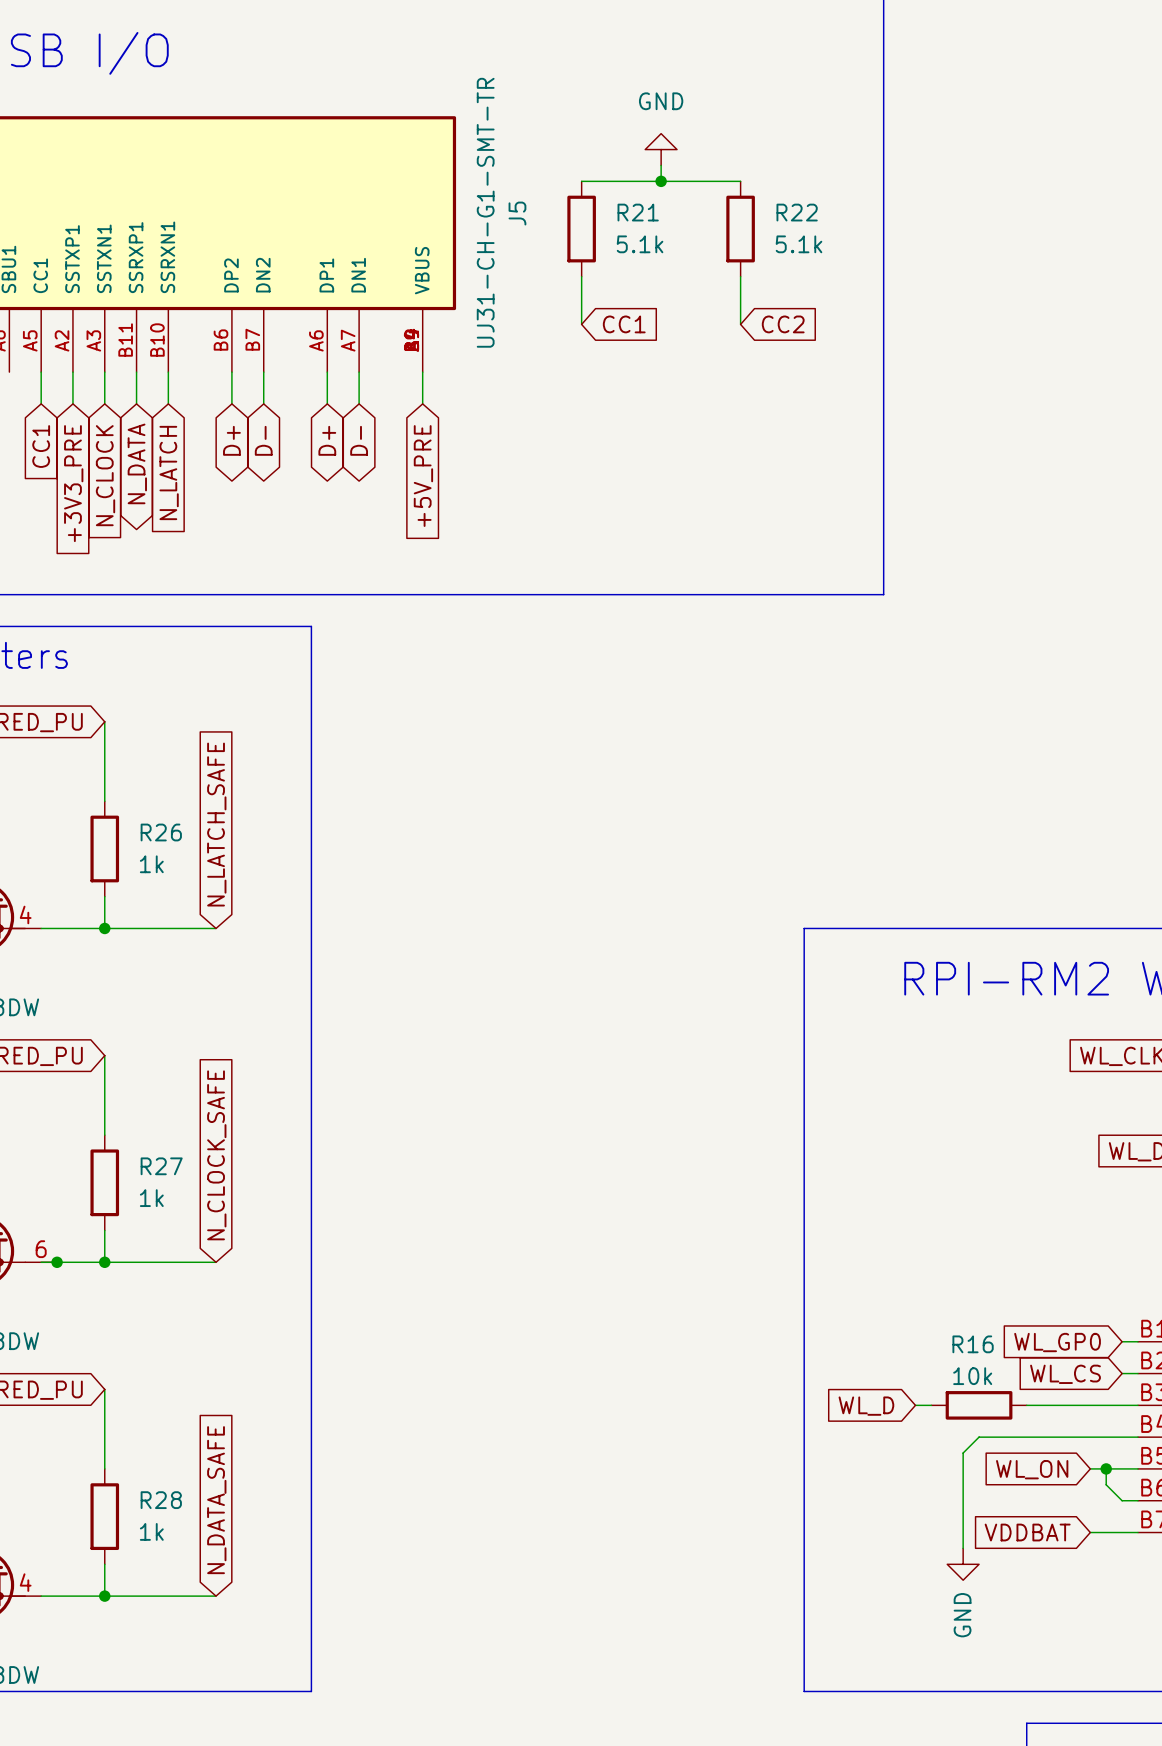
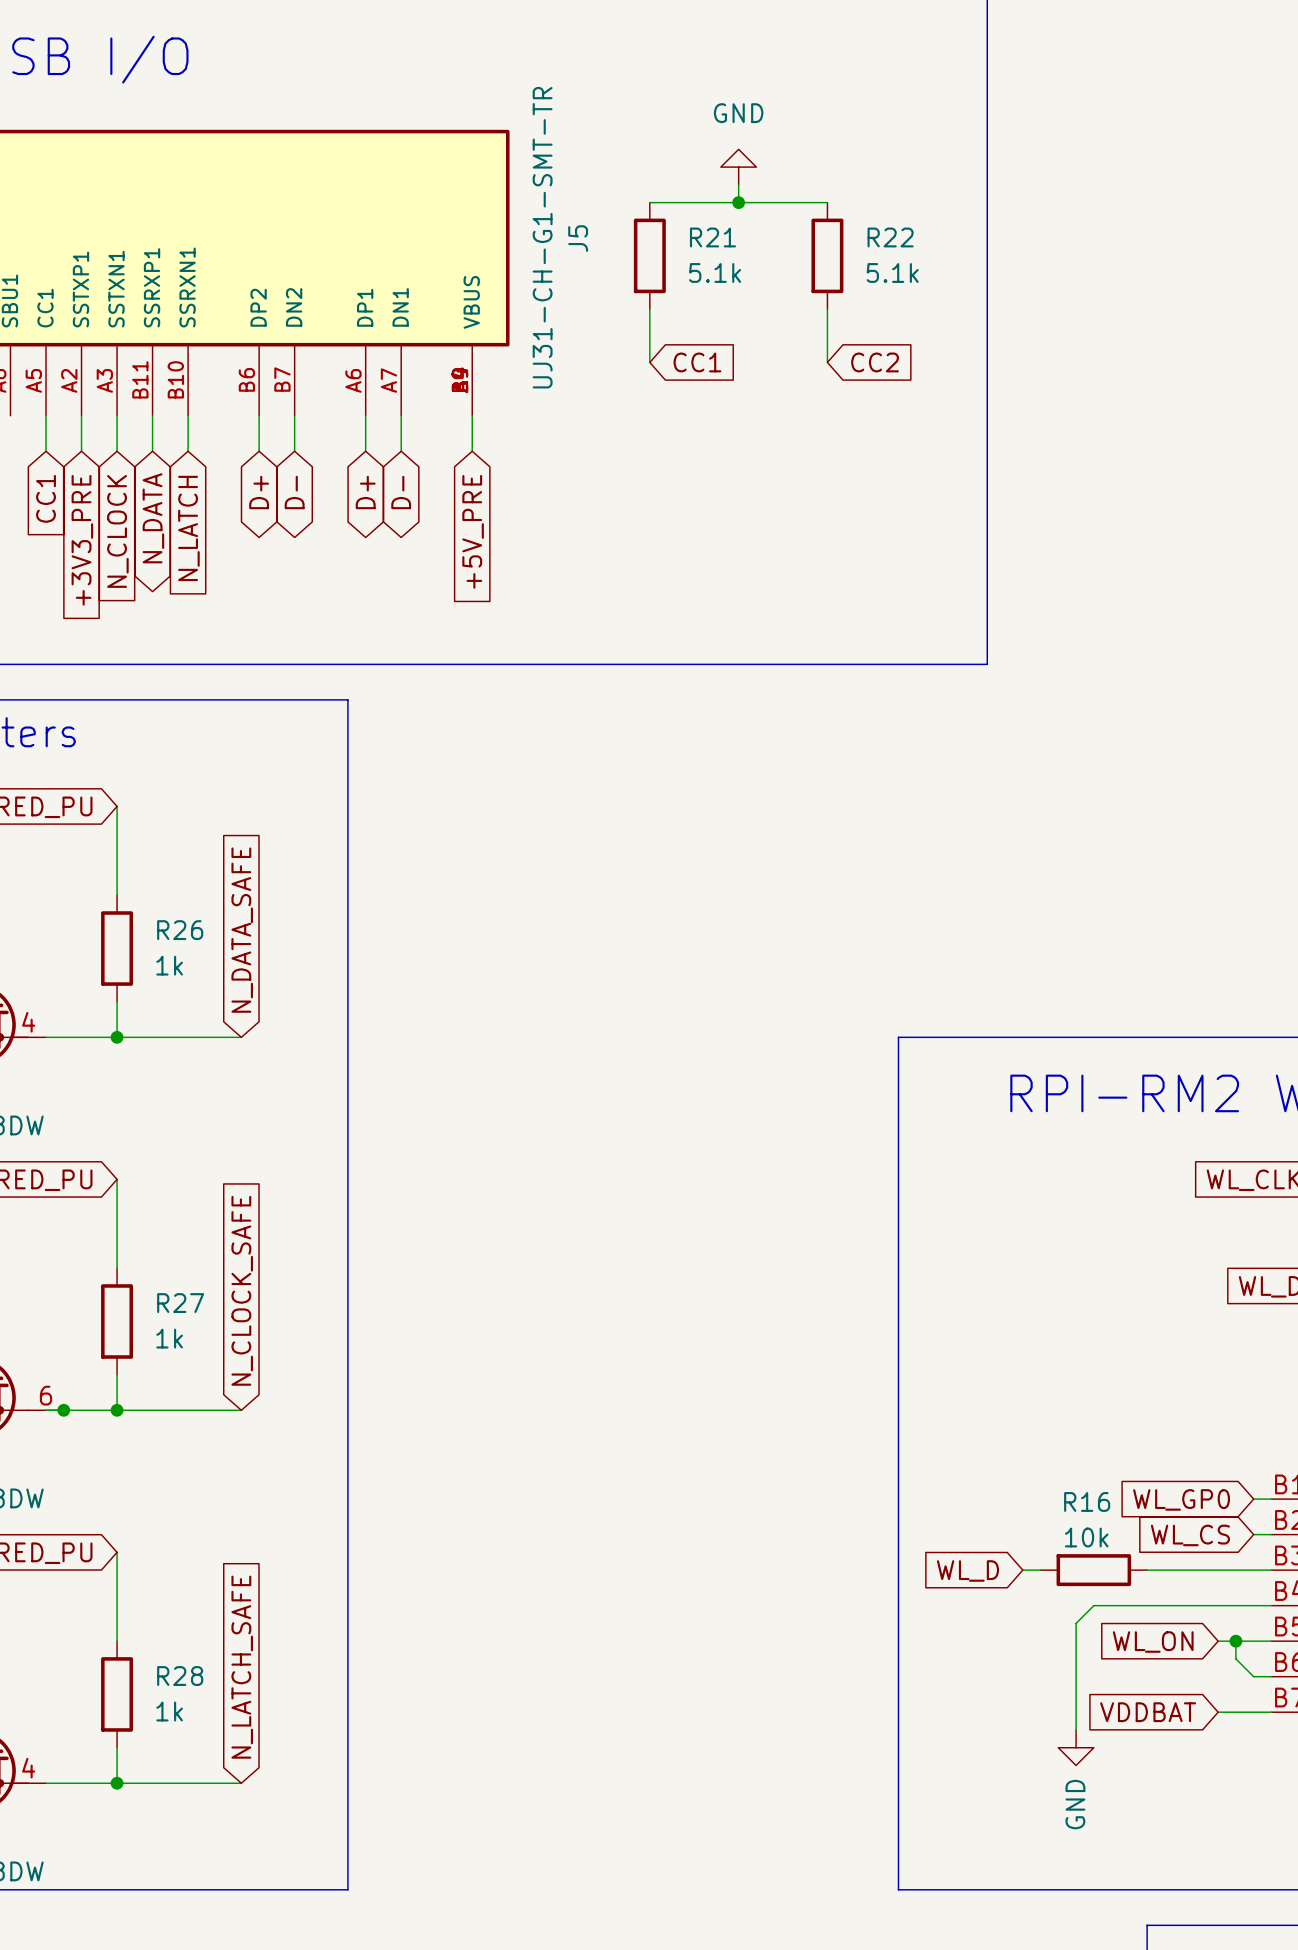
global label: N_LATCH_SAFE (216, 824) -> N_DATA_SAFE (242, 930)
global label: N_DATA_SAFE (216, 1500) -> N_LATCH_SAFE (242, 1667)

